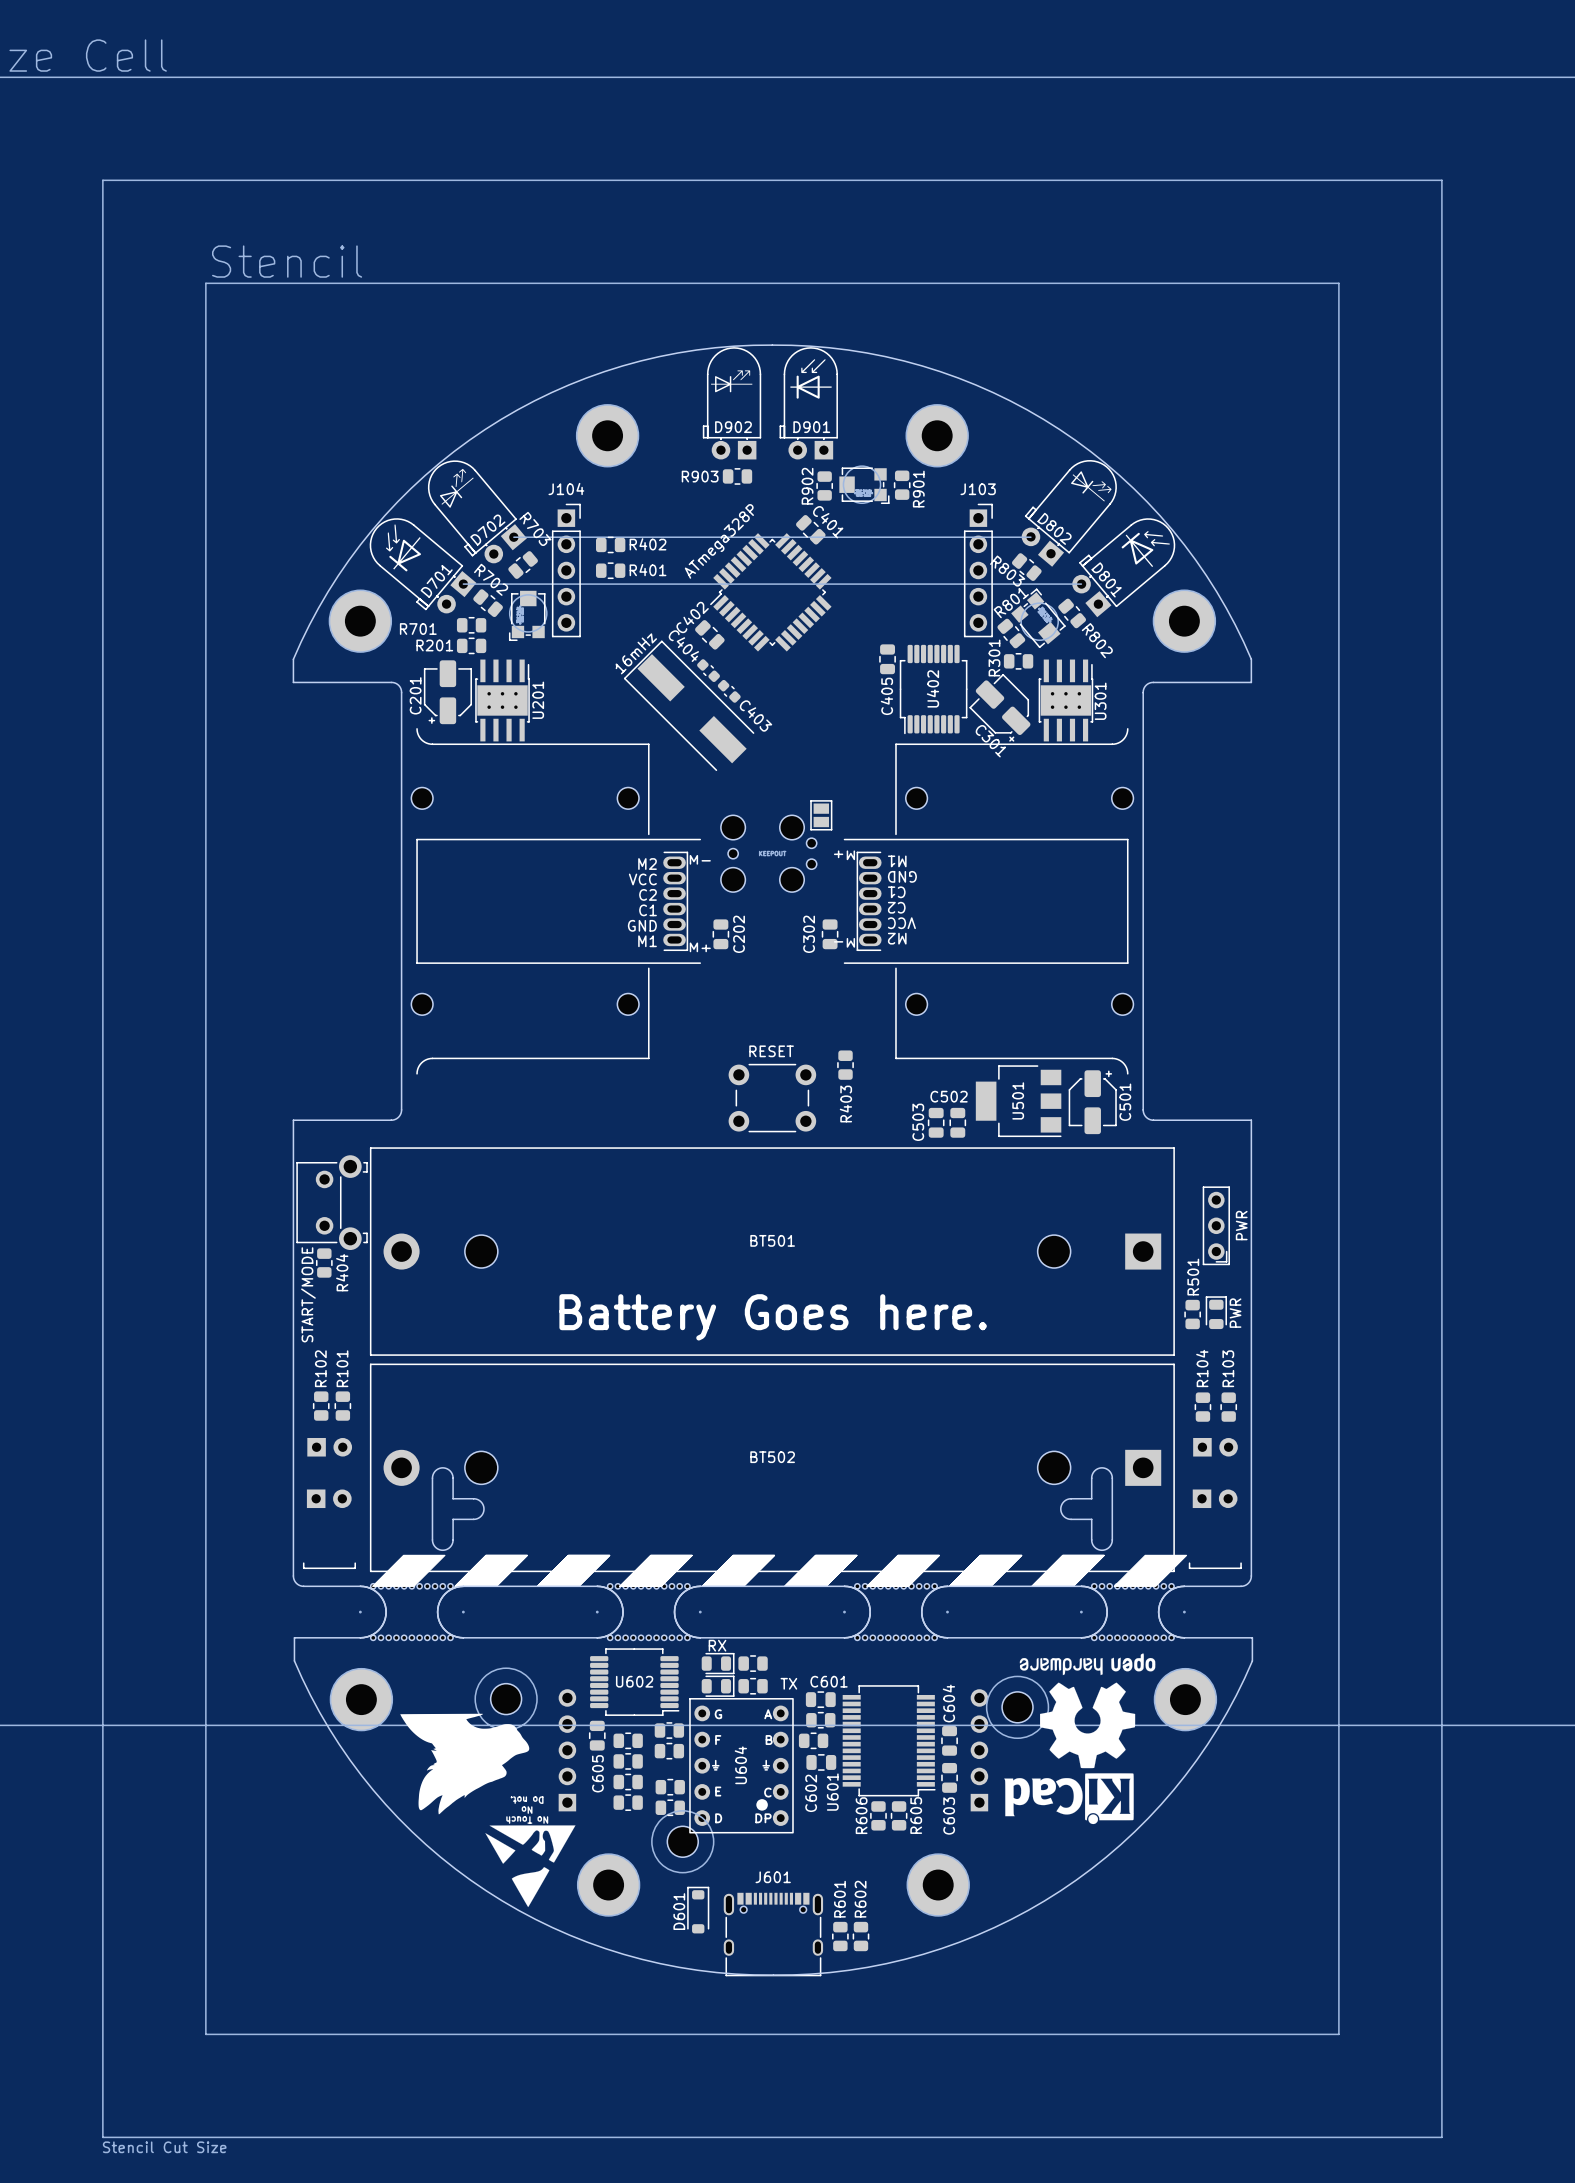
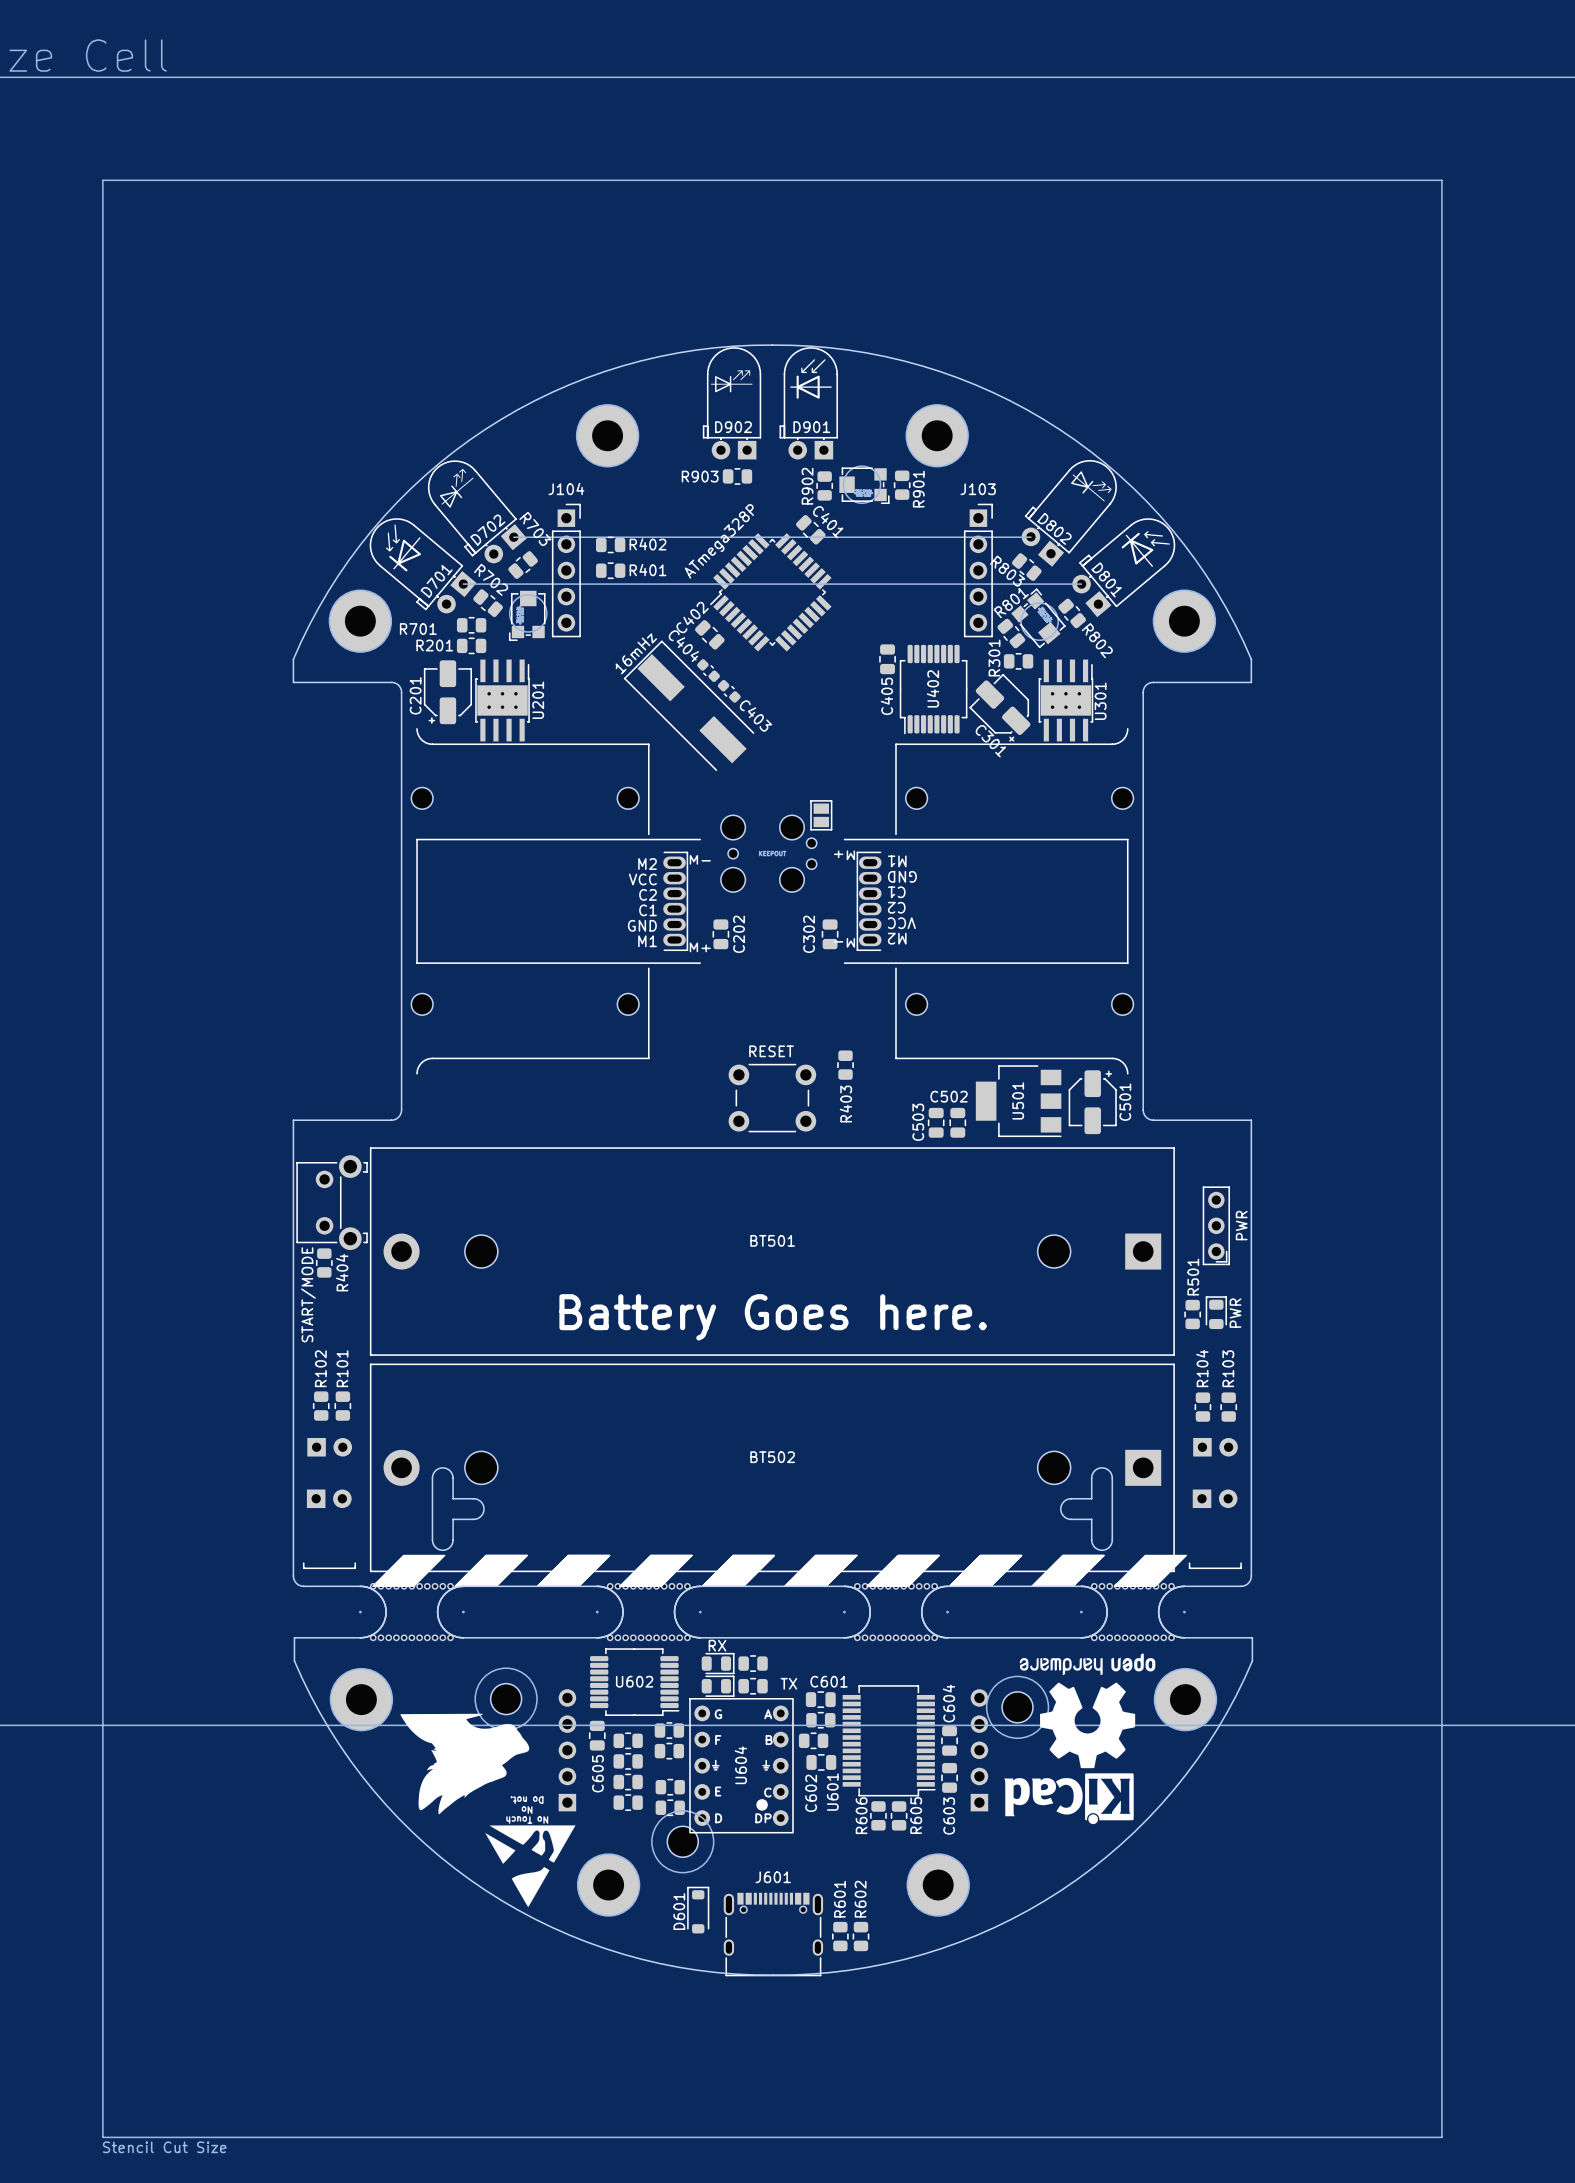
text: Stencil (287, 261) -> none
line: (205, 283) (1338, 283) (1338, 2034) (205, 2034) (205, 283) -> none

